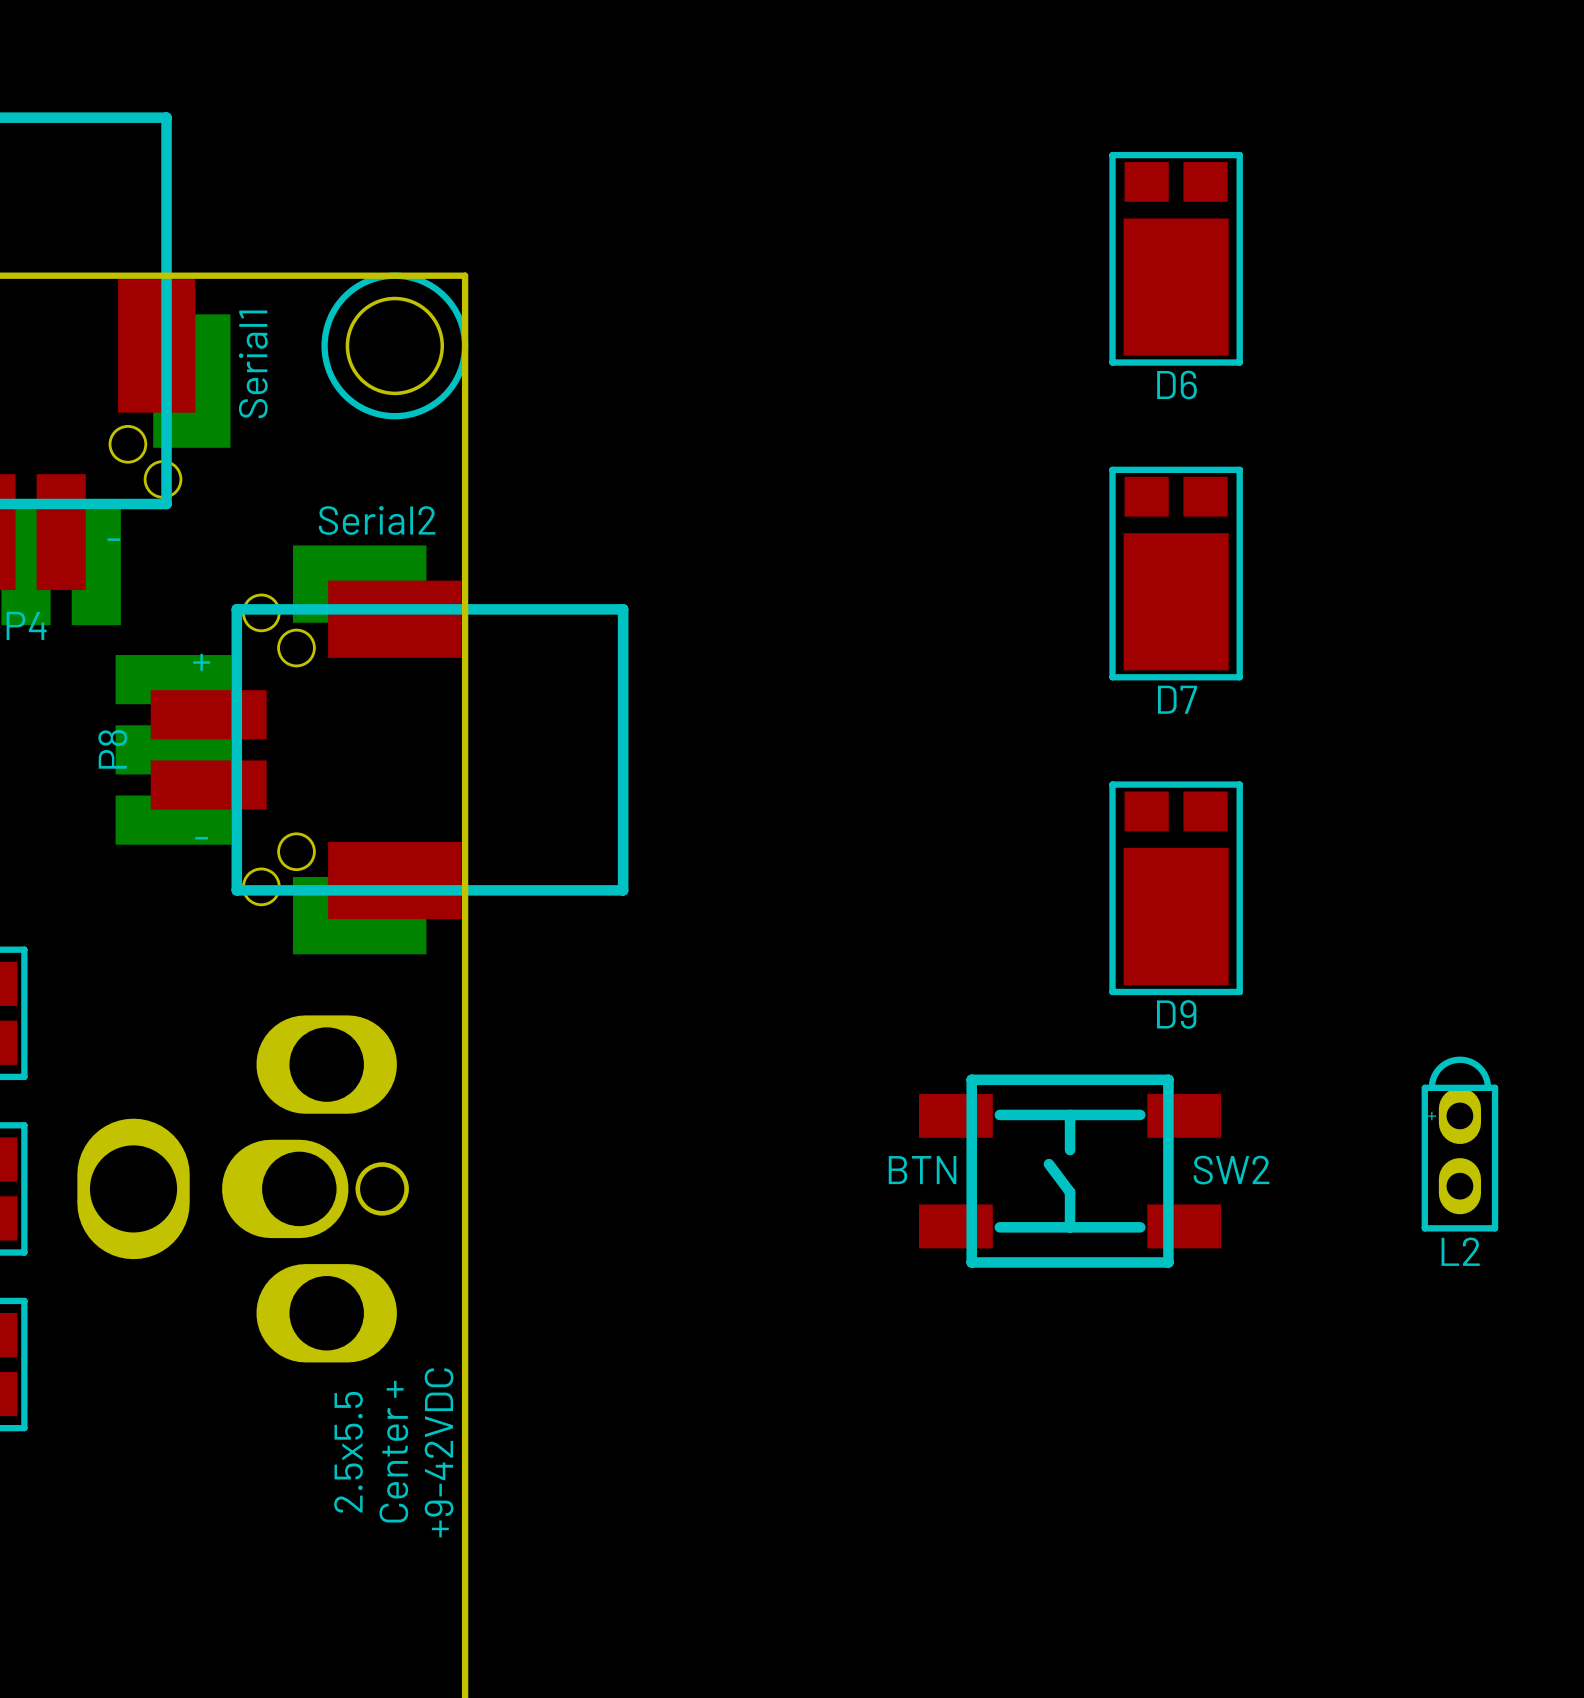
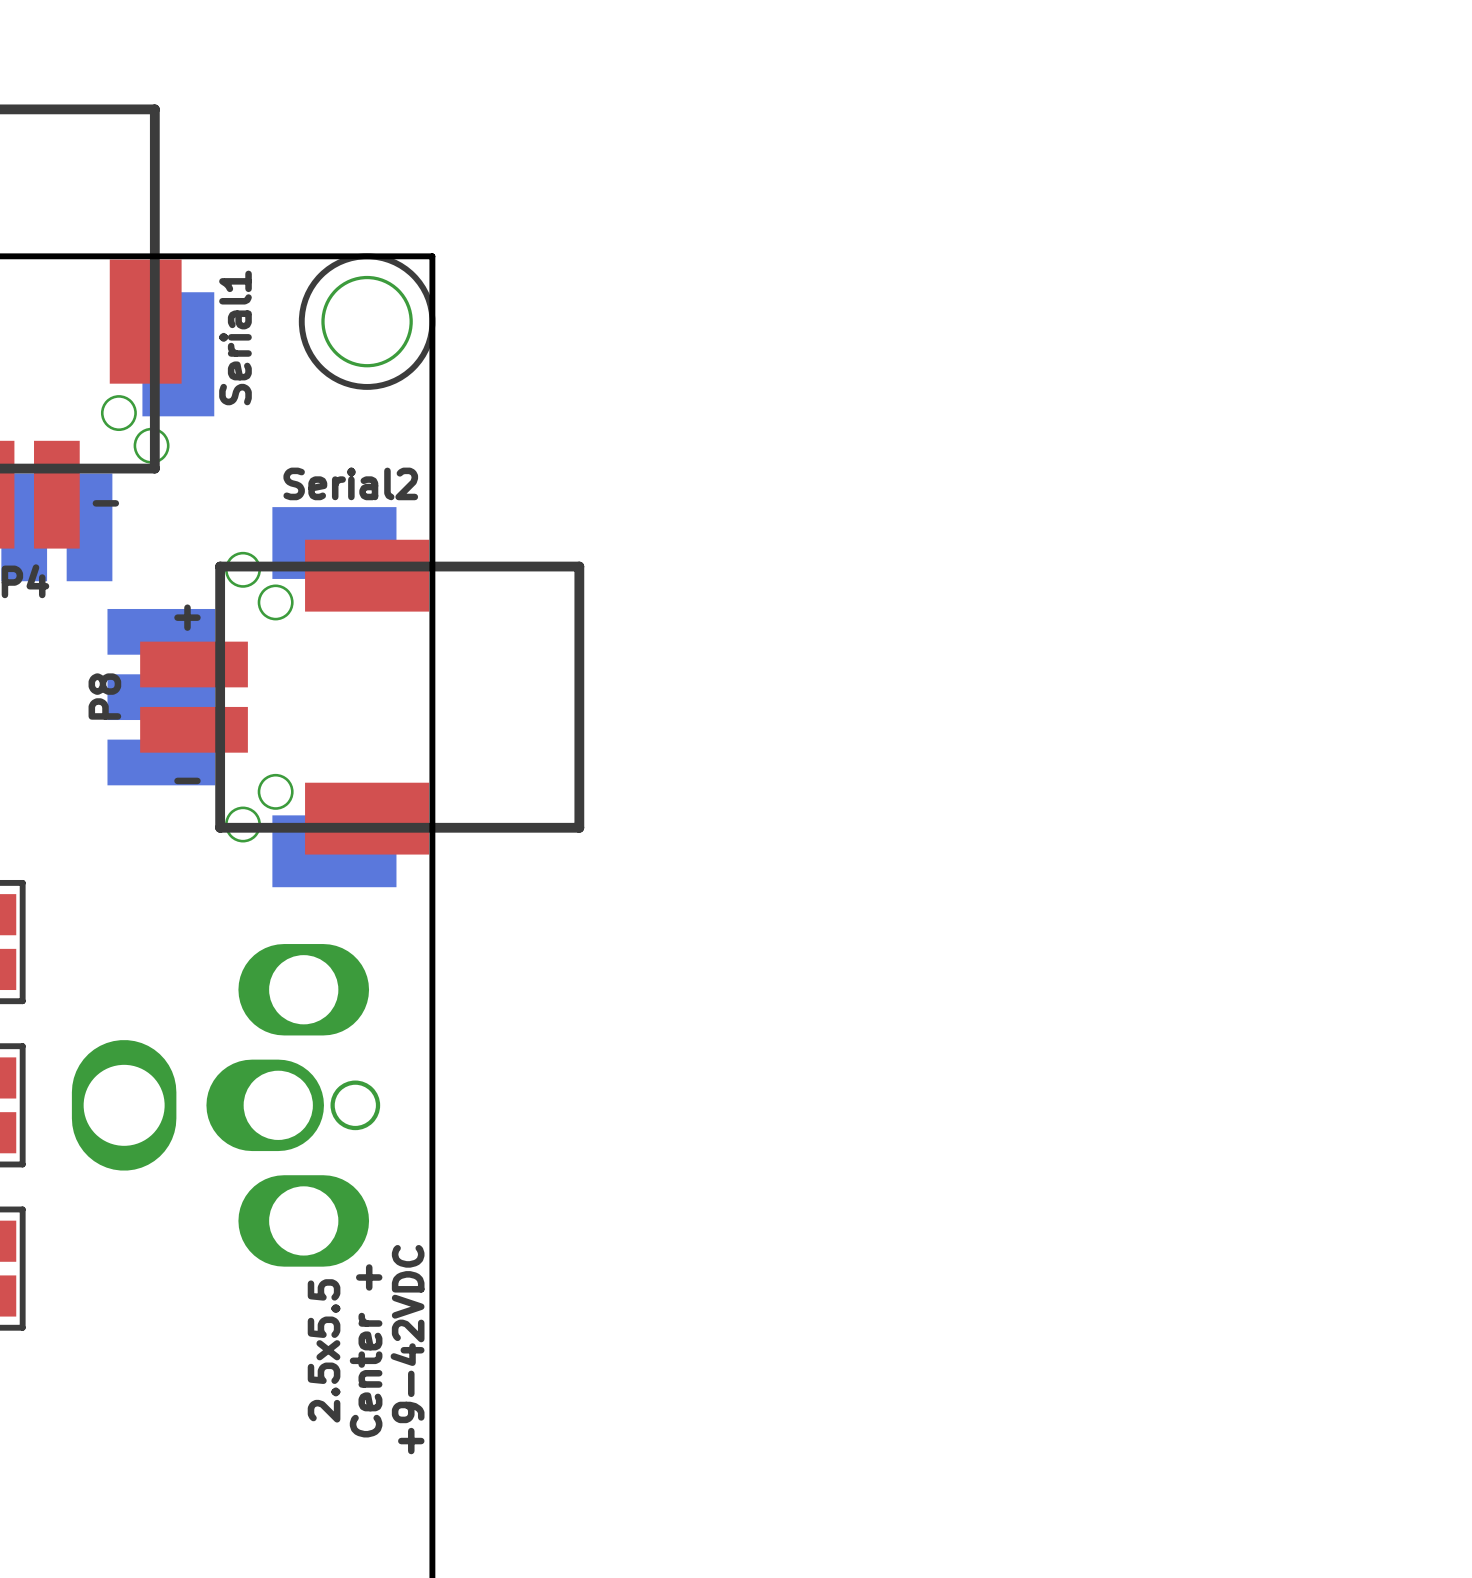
D6: (1176, 258) -> none
D7: (1176, 573) -> none
D9: (1176, 888) -> none
L2: (1459, 1144) -> none
SW2: (1070, 1171) -> none

